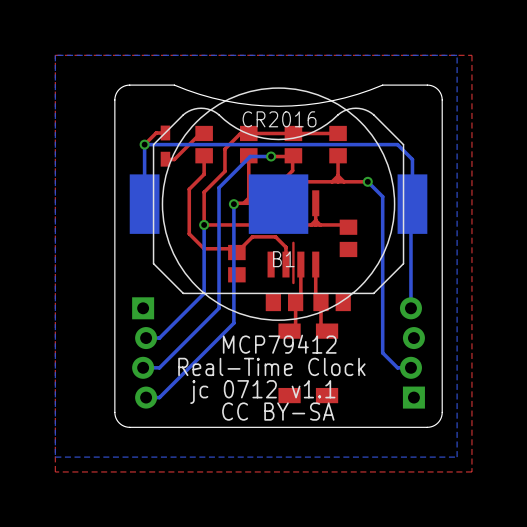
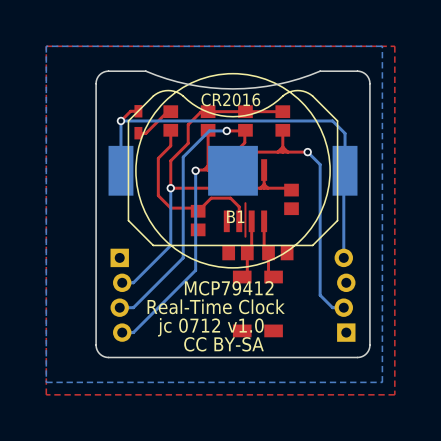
text: jc 0712 v1.1 (262, 392) -> jc 0712 v1.0 (210, 327)

